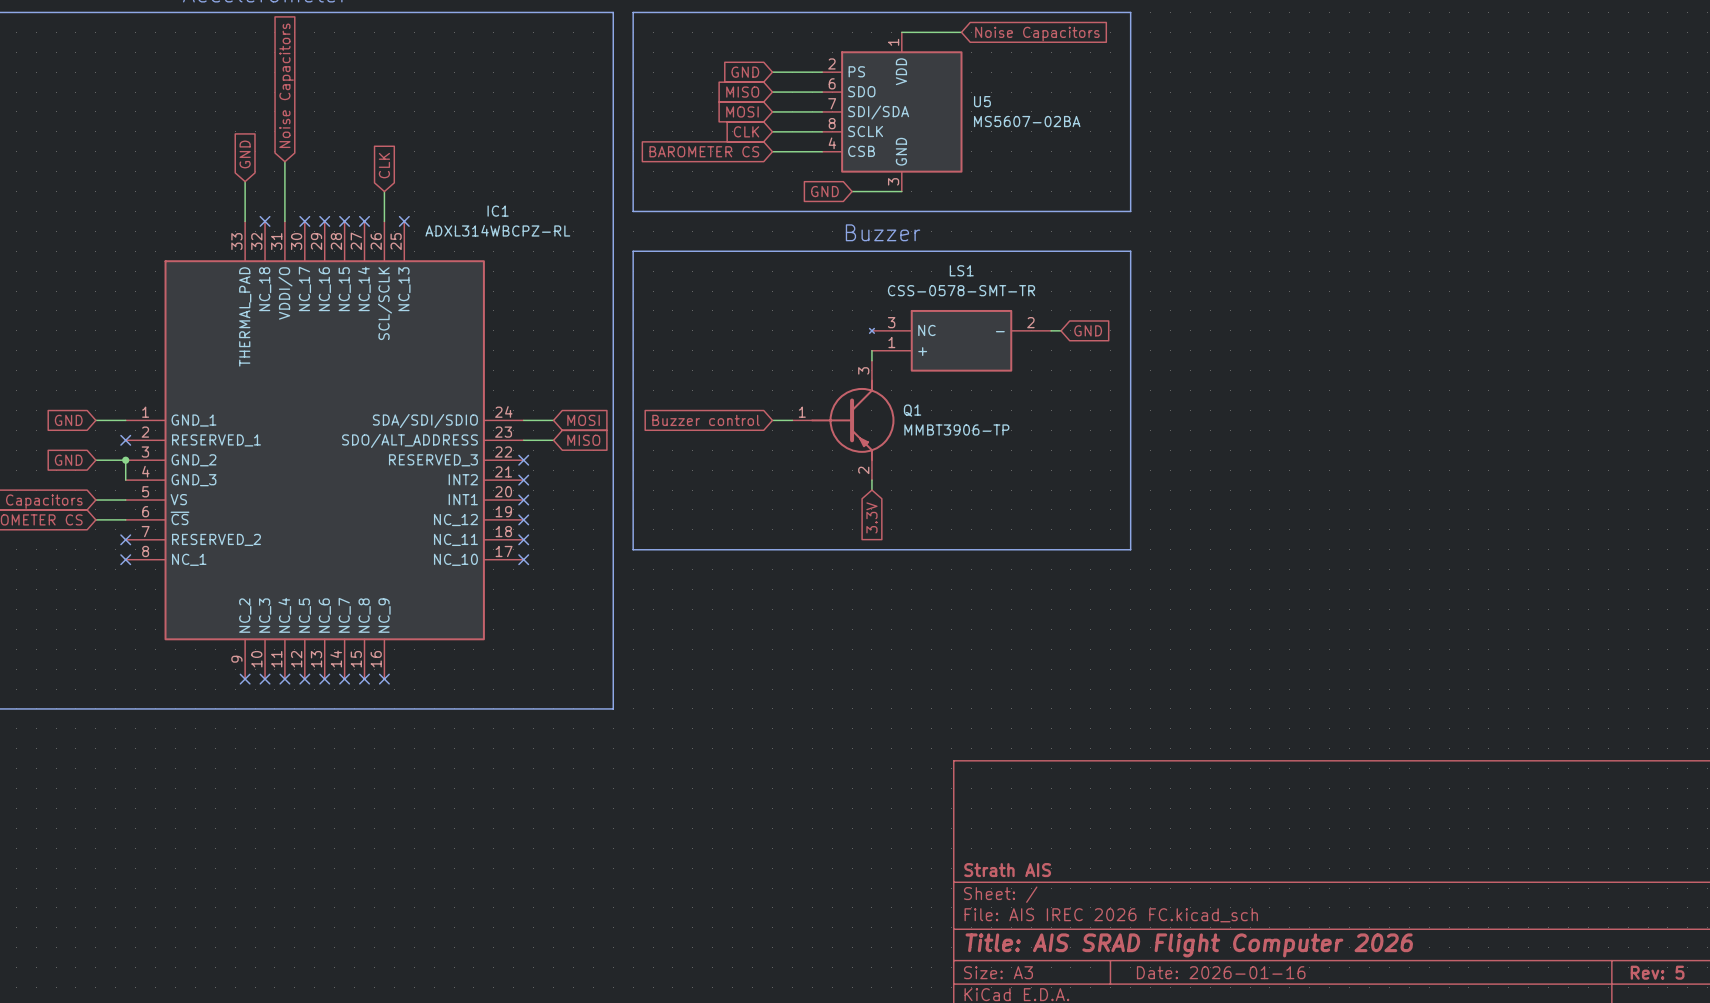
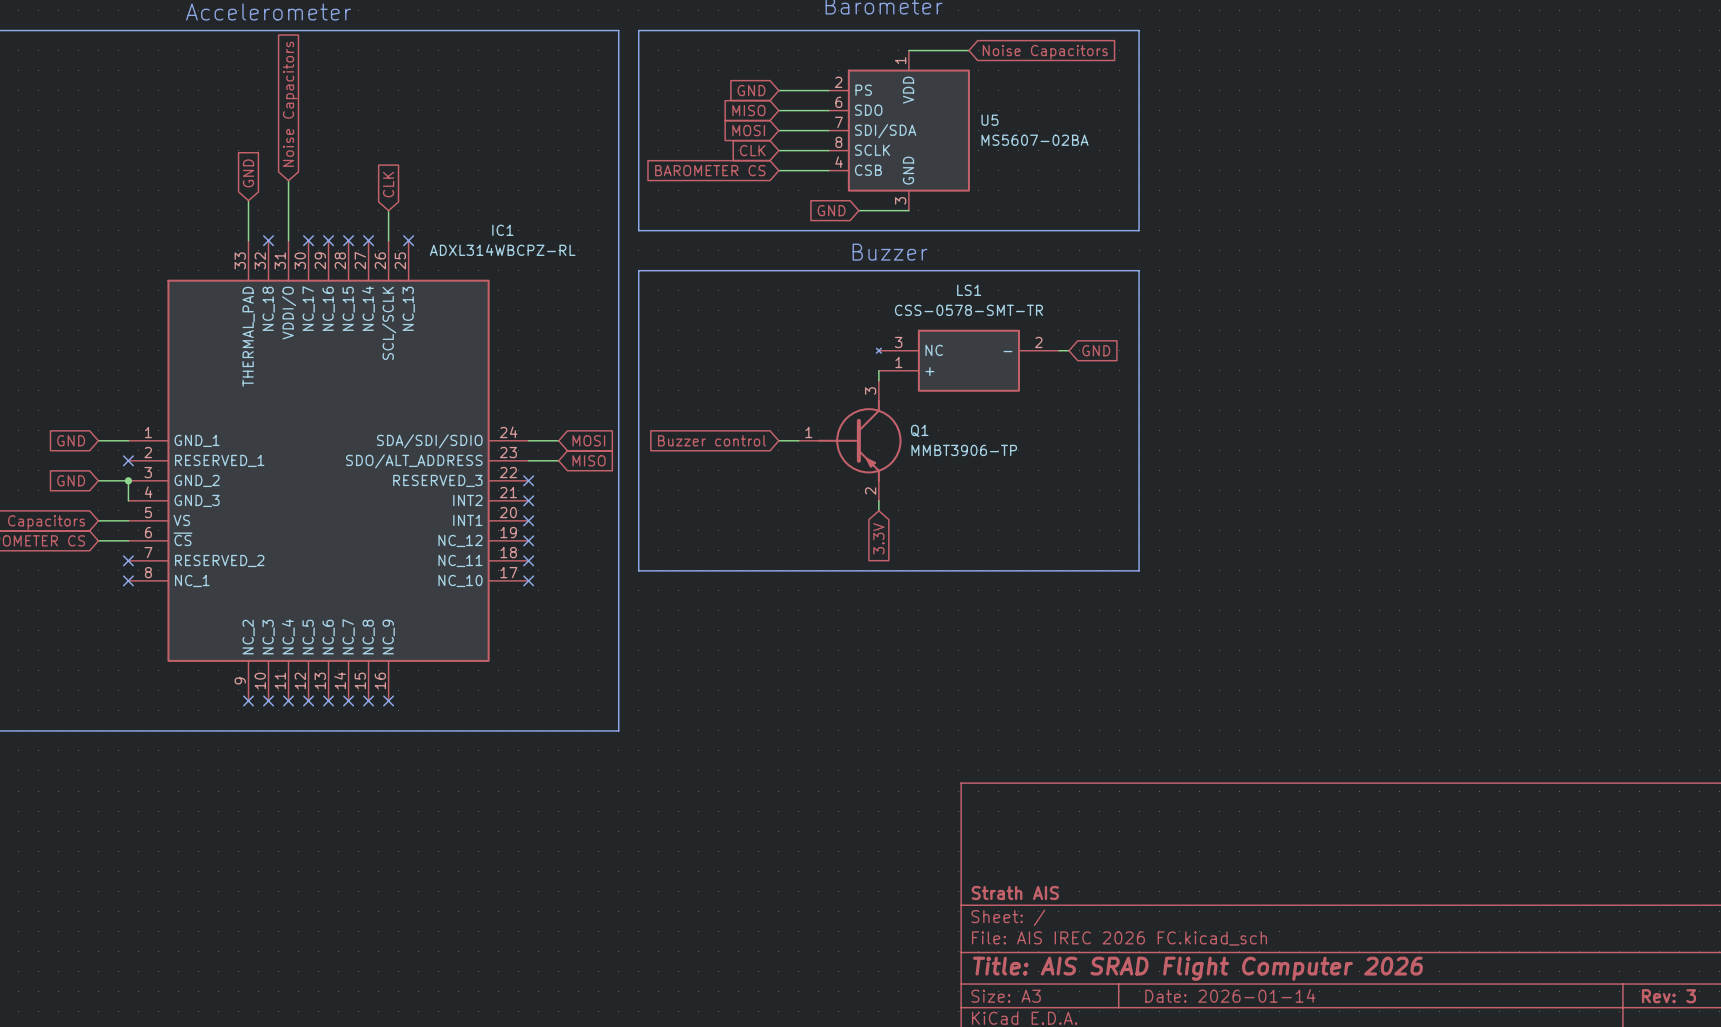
title block: Date: 2026-01-16 (1221, 972) -> Date: 2026-01-14 (1230, 995)
title block: Rev: 5 (1657, 972) -> Rev: 3 (1668, 996)

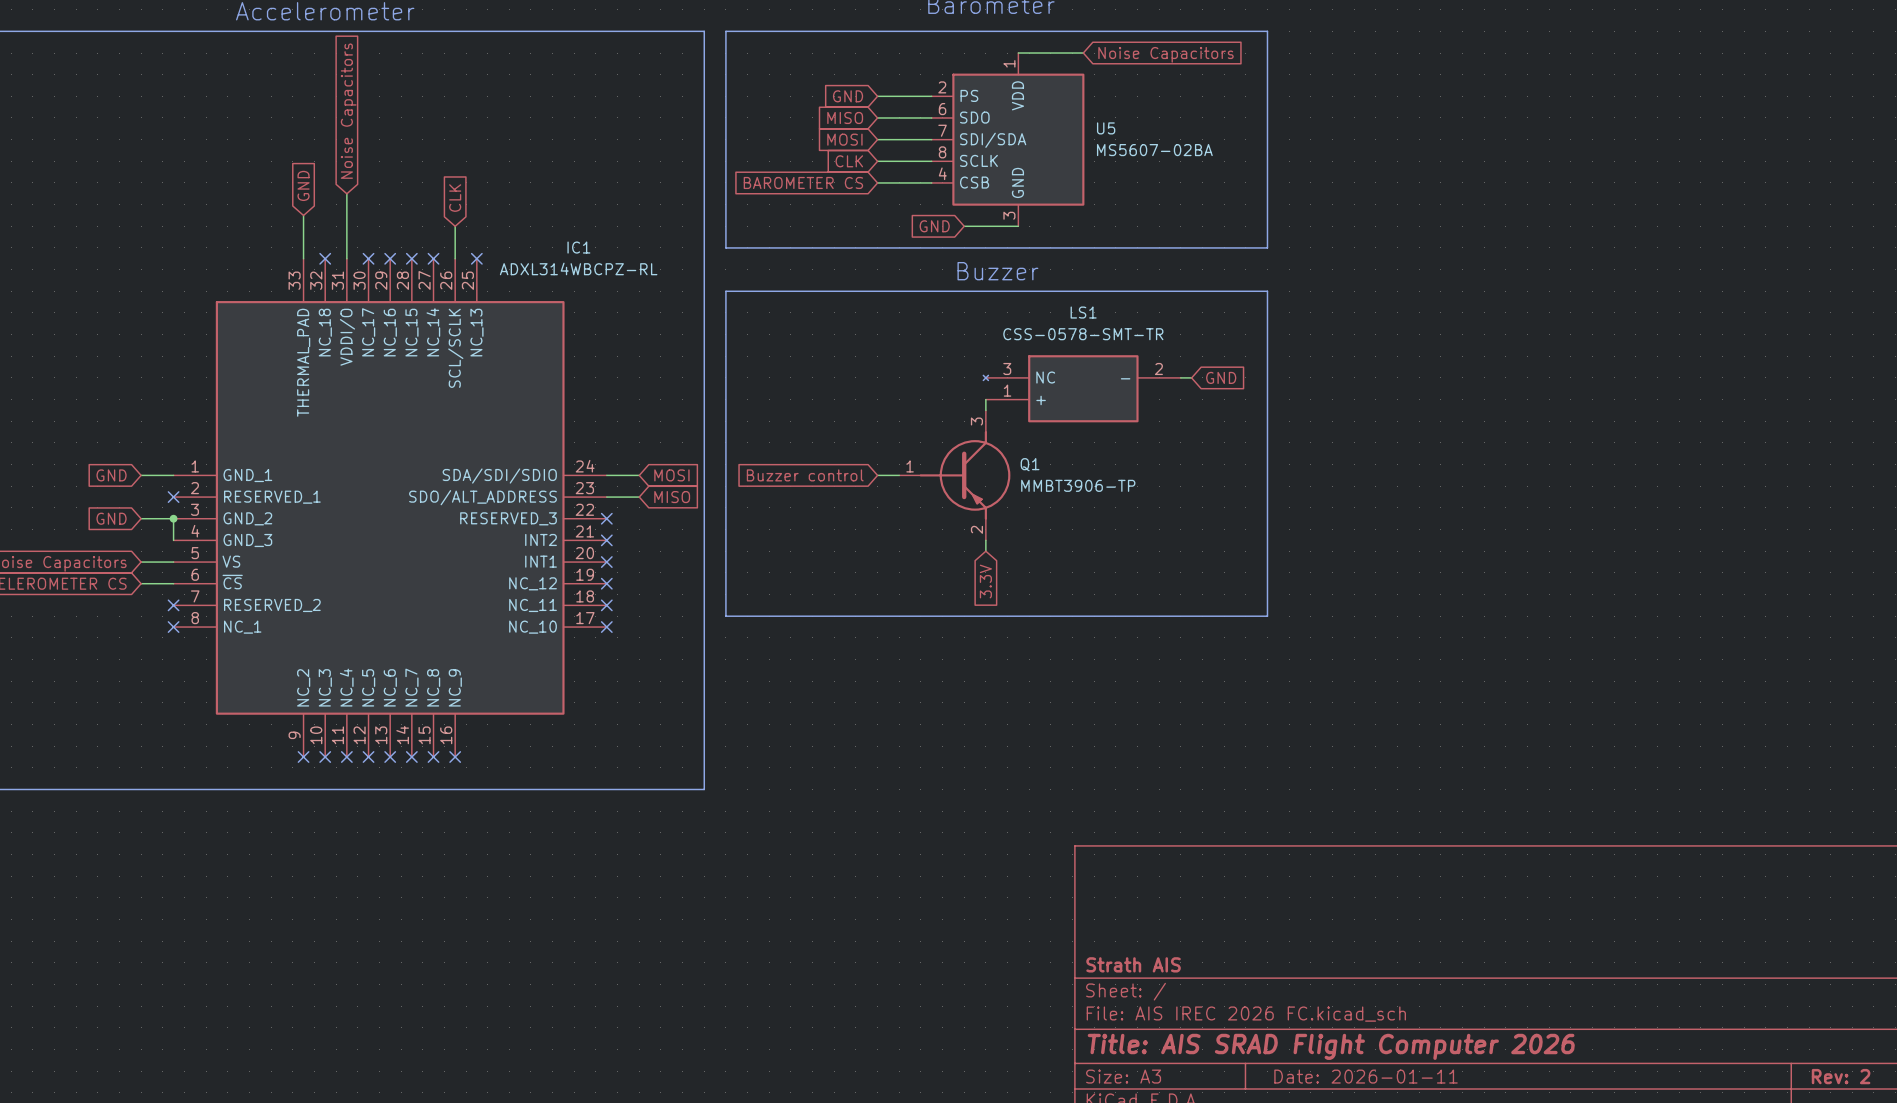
title block: Date: 2026-01-14 (1230, 995) -> Date: 2026-01-11 (1366, 1076)
title block: Rev: 3 (1668, 996) -> Rev: 2 (1841, 1076)

